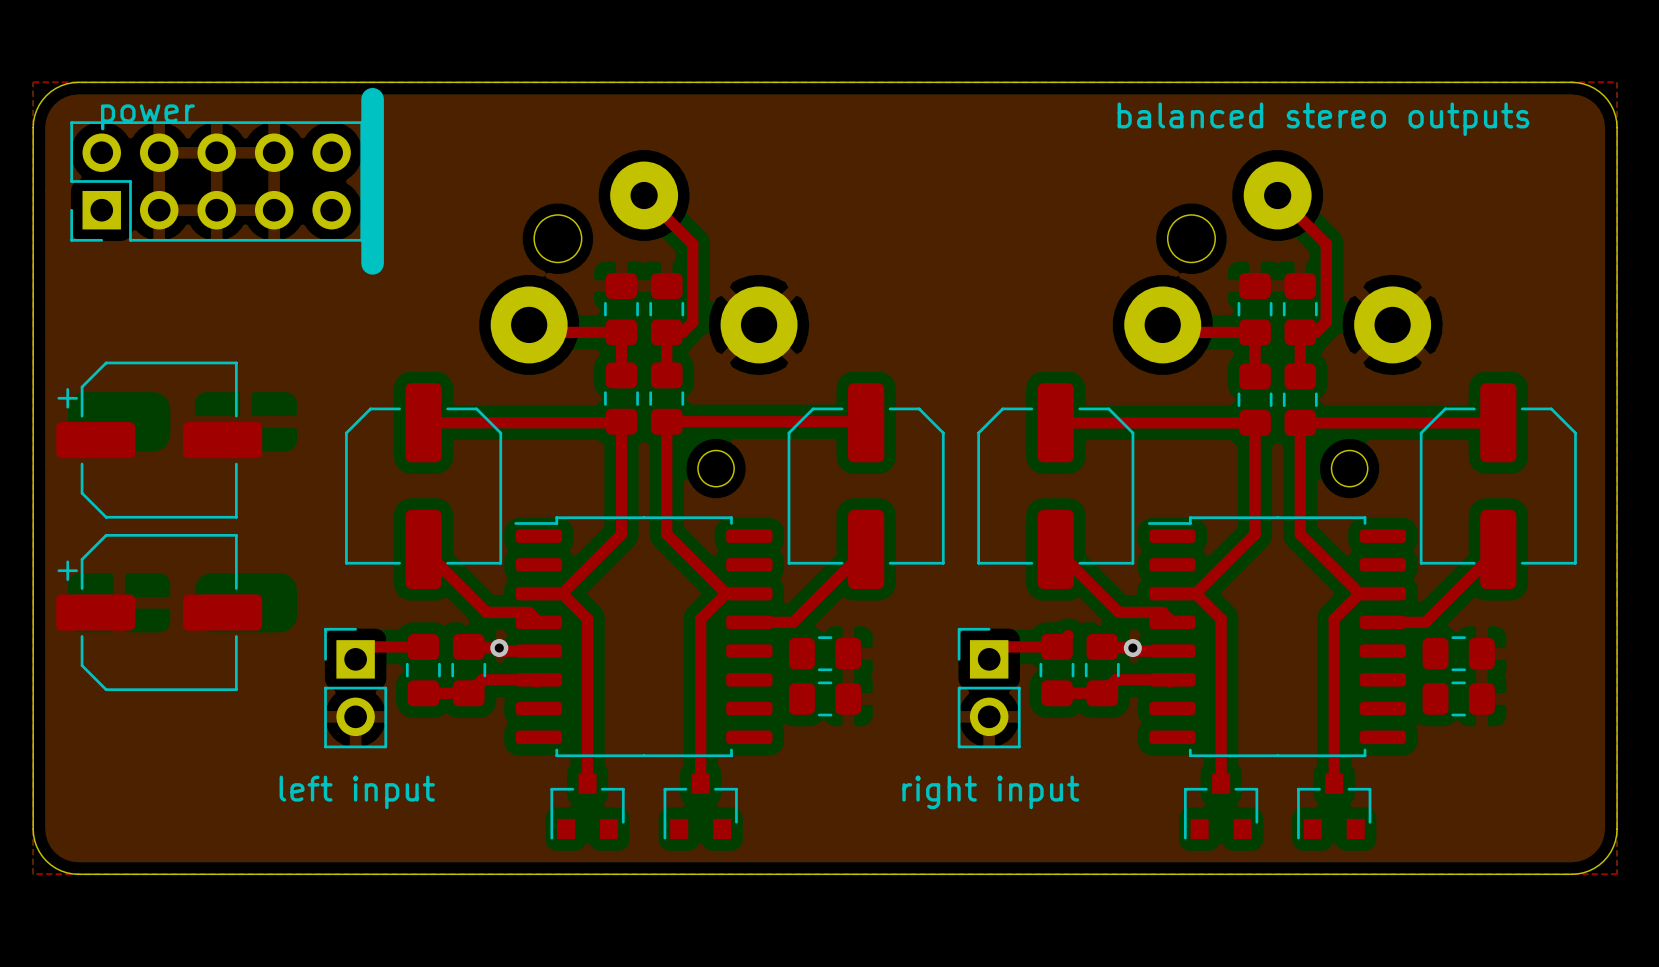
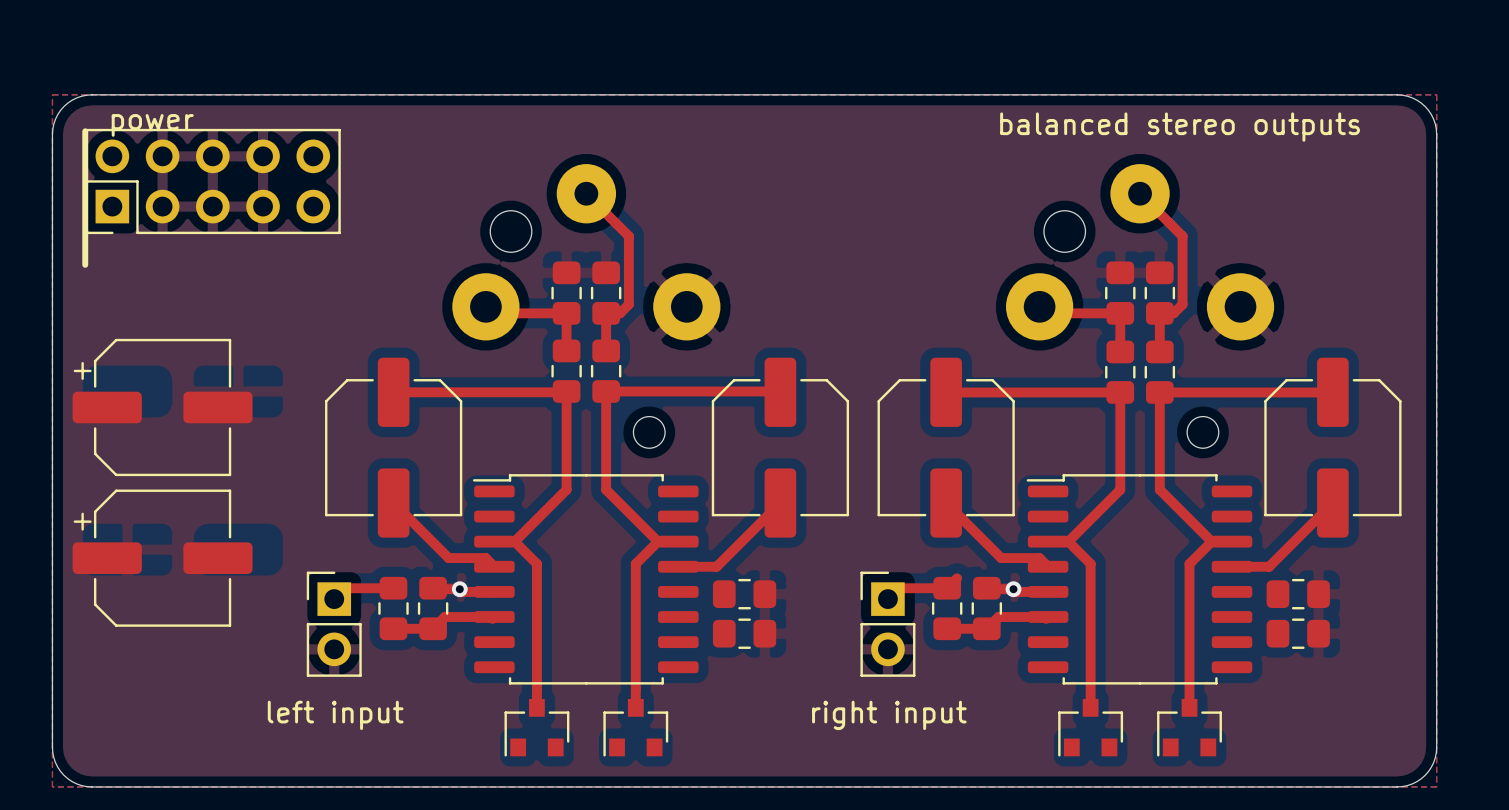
line: (372, 99) (372, 263) -> none
line: none -> (85, 131) (85, 264)

